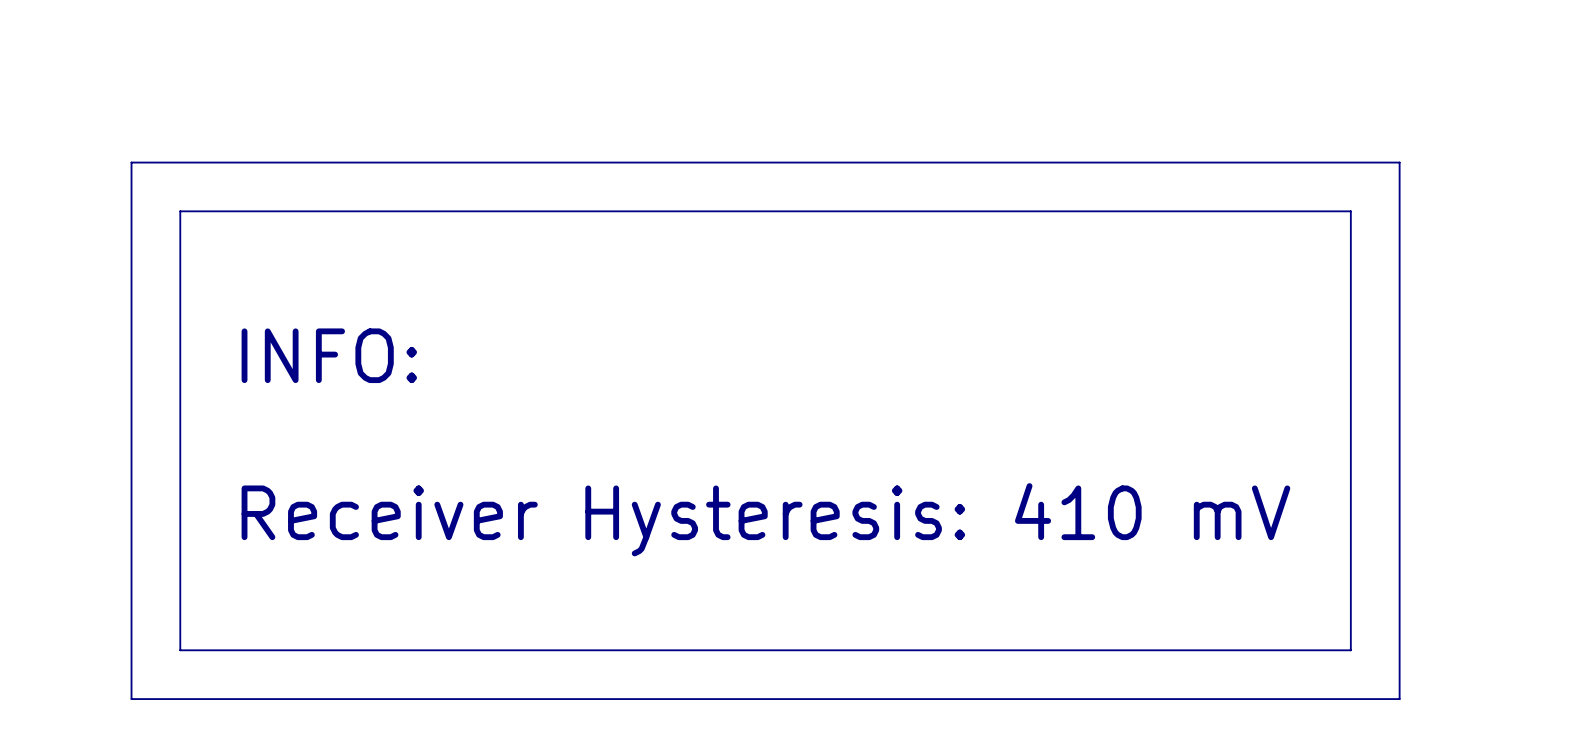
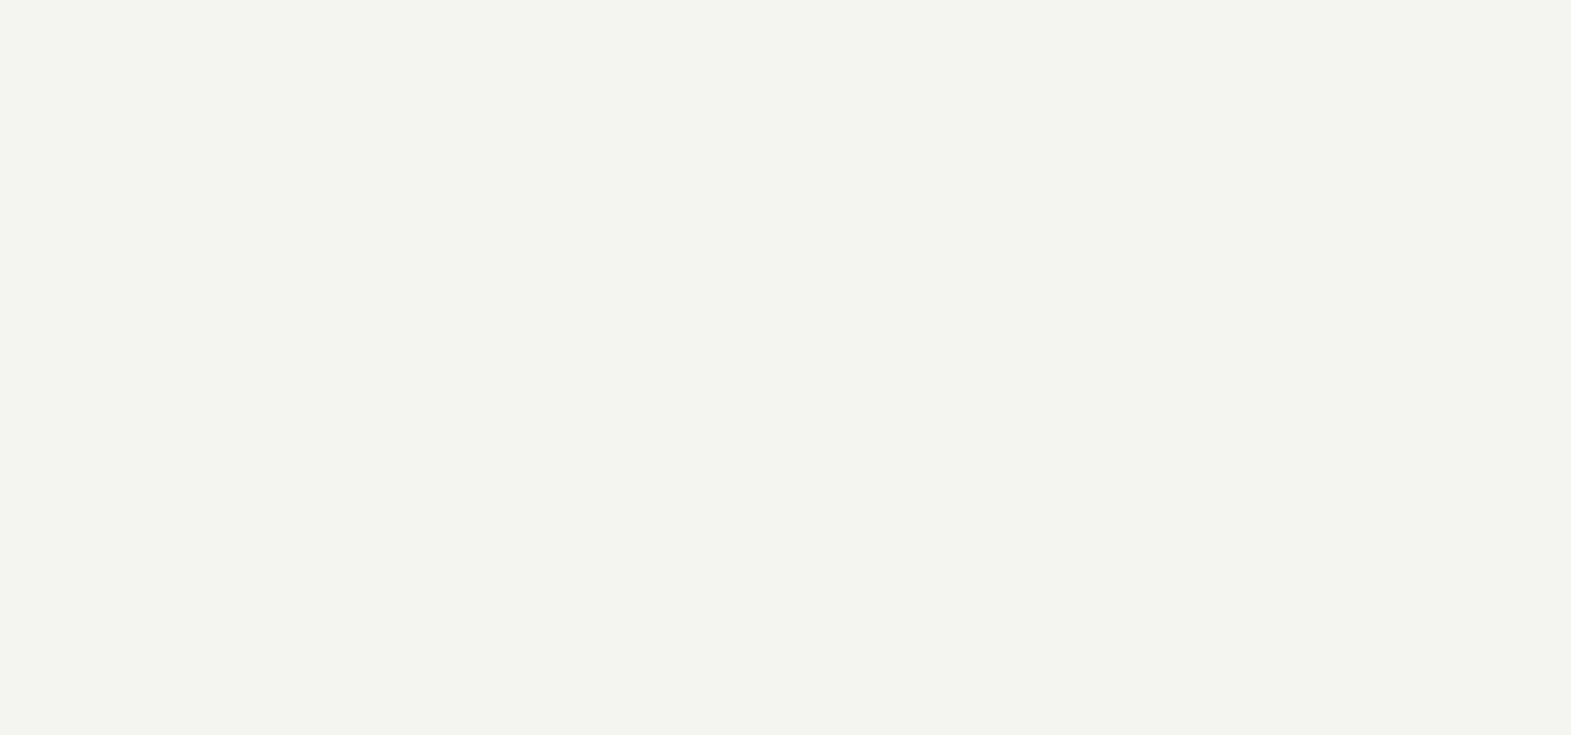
line: (131, 162) (131, 699) (1399, 699) (1399, 162) (131, 162) -> none
line: (180, 211) (1350, 211) (1350, 650) (180, 650) (180, 211) -> none
text: INFO: (329, 355) -> none
text: Receiver Hysteresis: 410 mV (765, 519) -> none

